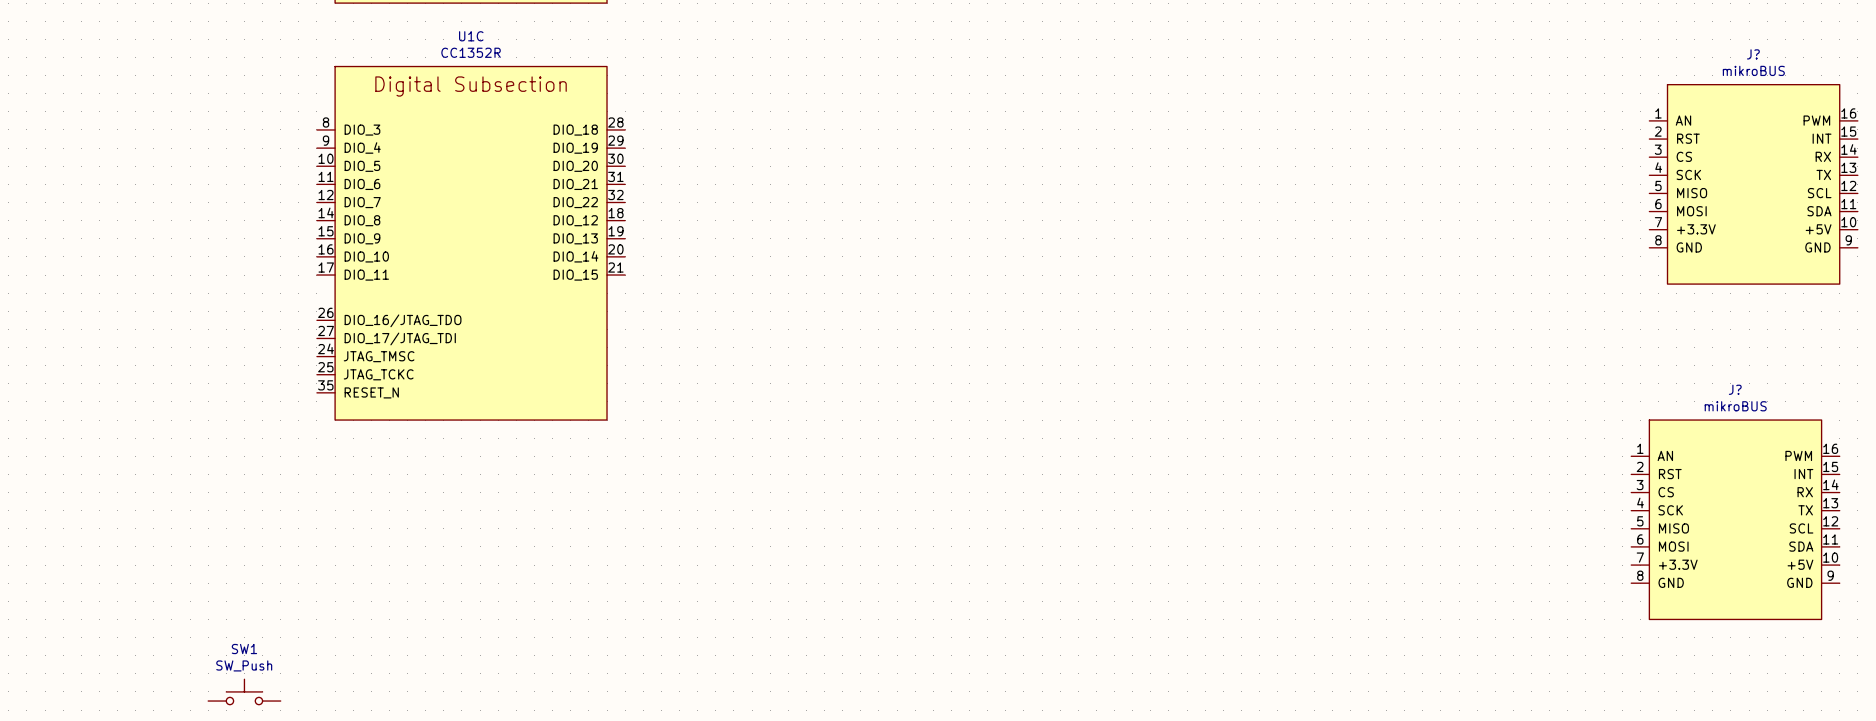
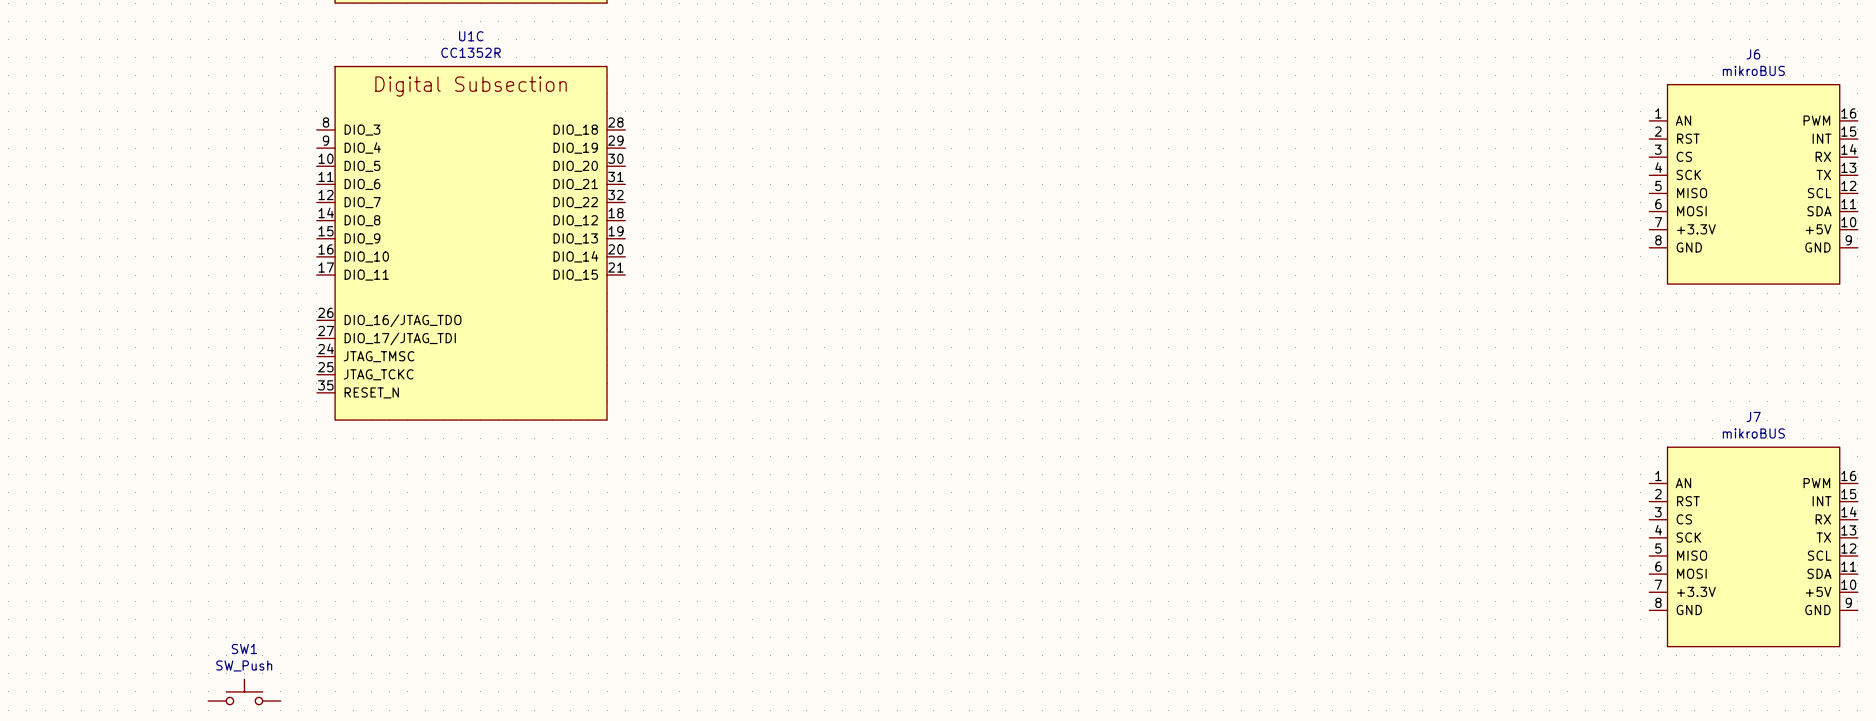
J? name: J? (1753, 54) -> J6 (1753, 54)
J?: mikroBUS (1735, 519) -> none
J7: none -> mikroBUS (1753, 546)

